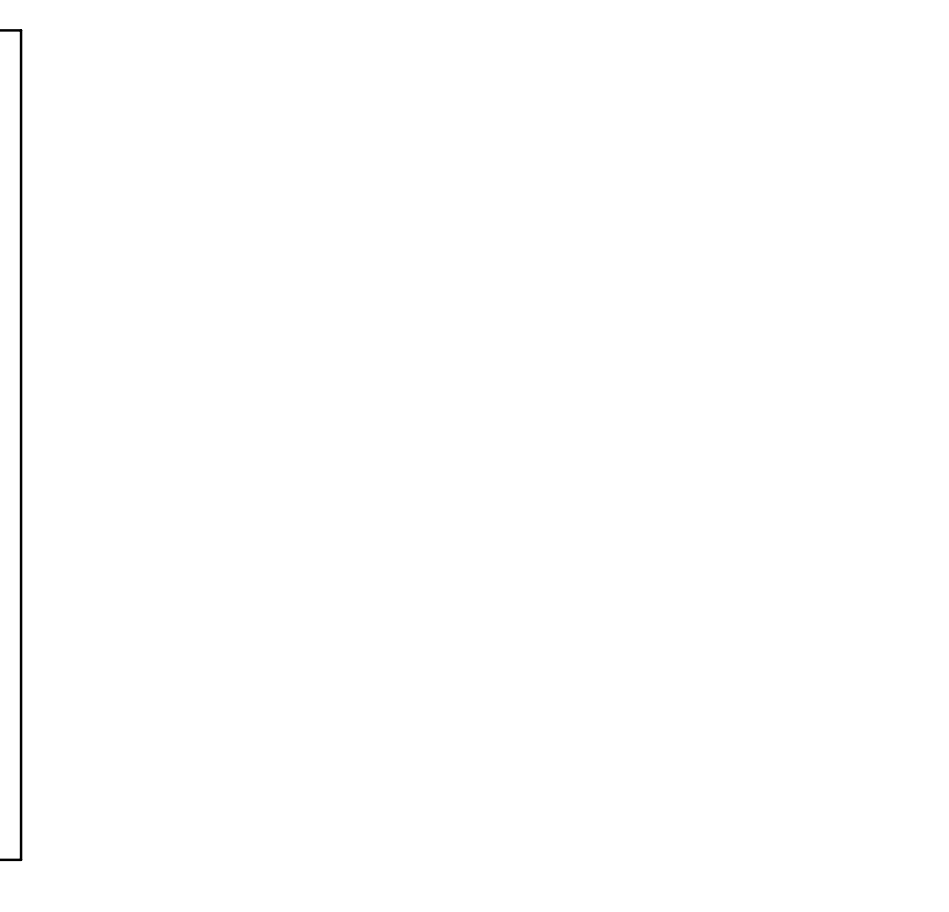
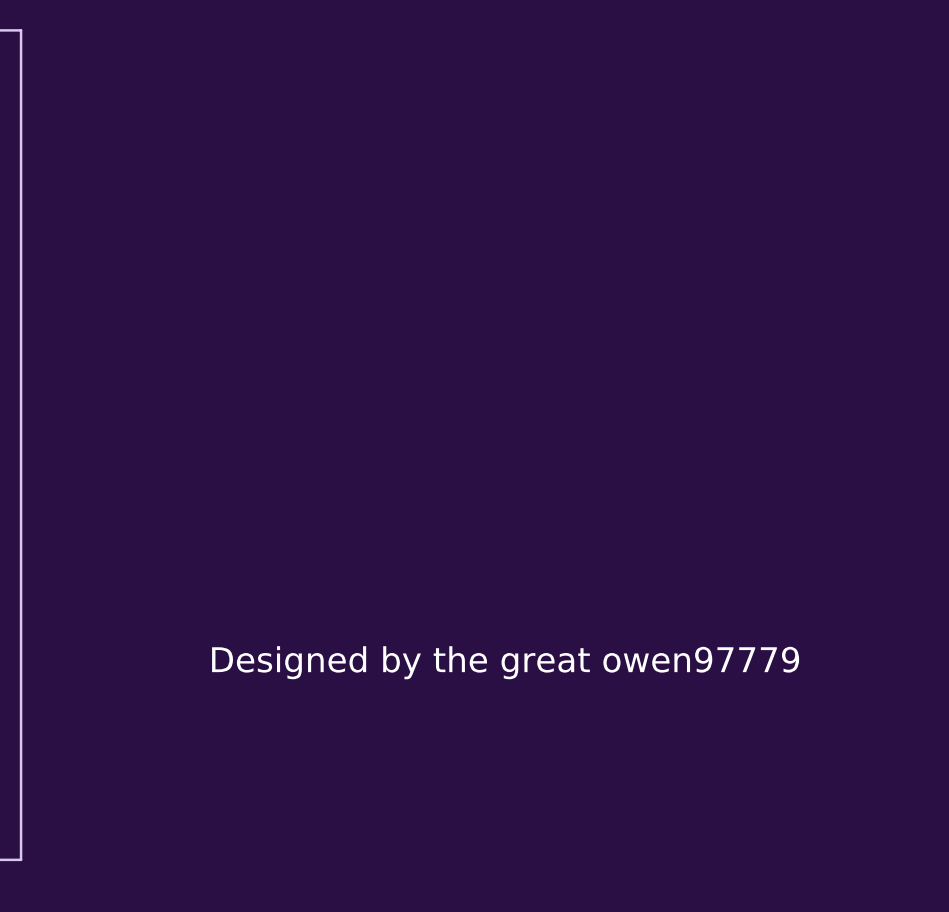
text: none -> Designed by the great owen97779 (505, 662)

